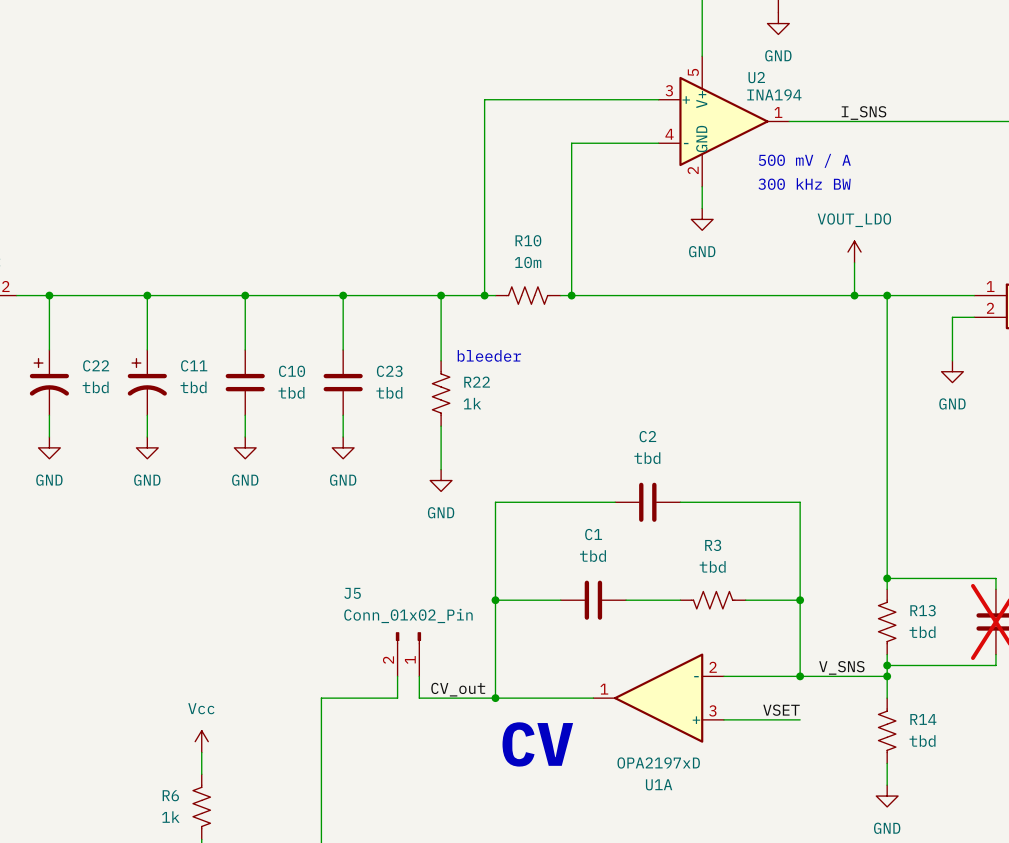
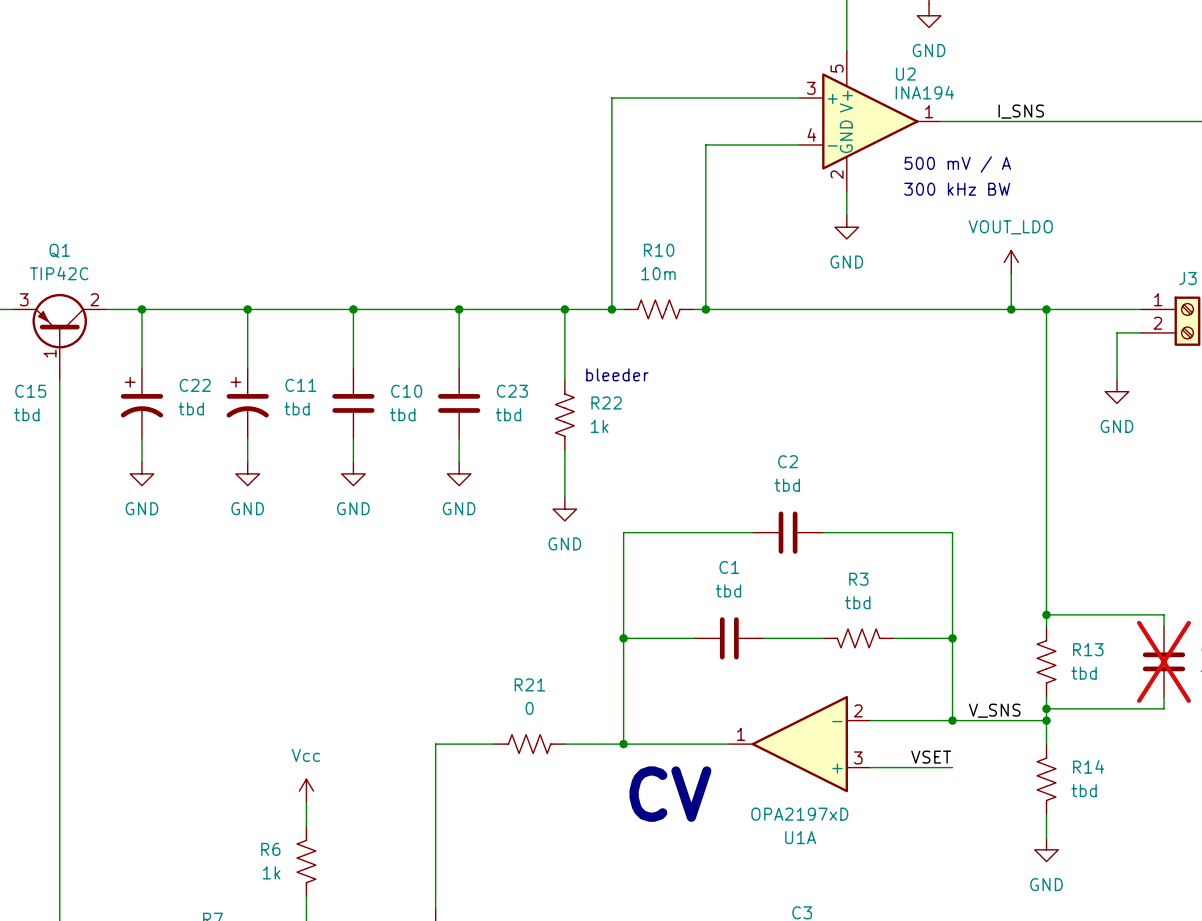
J5: Conn_01x02_Pin (408, 654) -> none
wire: (397, 676) (397, 698) (375, 698) -> none
wire: (419, 676) (419, 698) (441, 698) -> none
label: CV_out (458, 689) -> none
R21: none -> 0 (529, 744)

